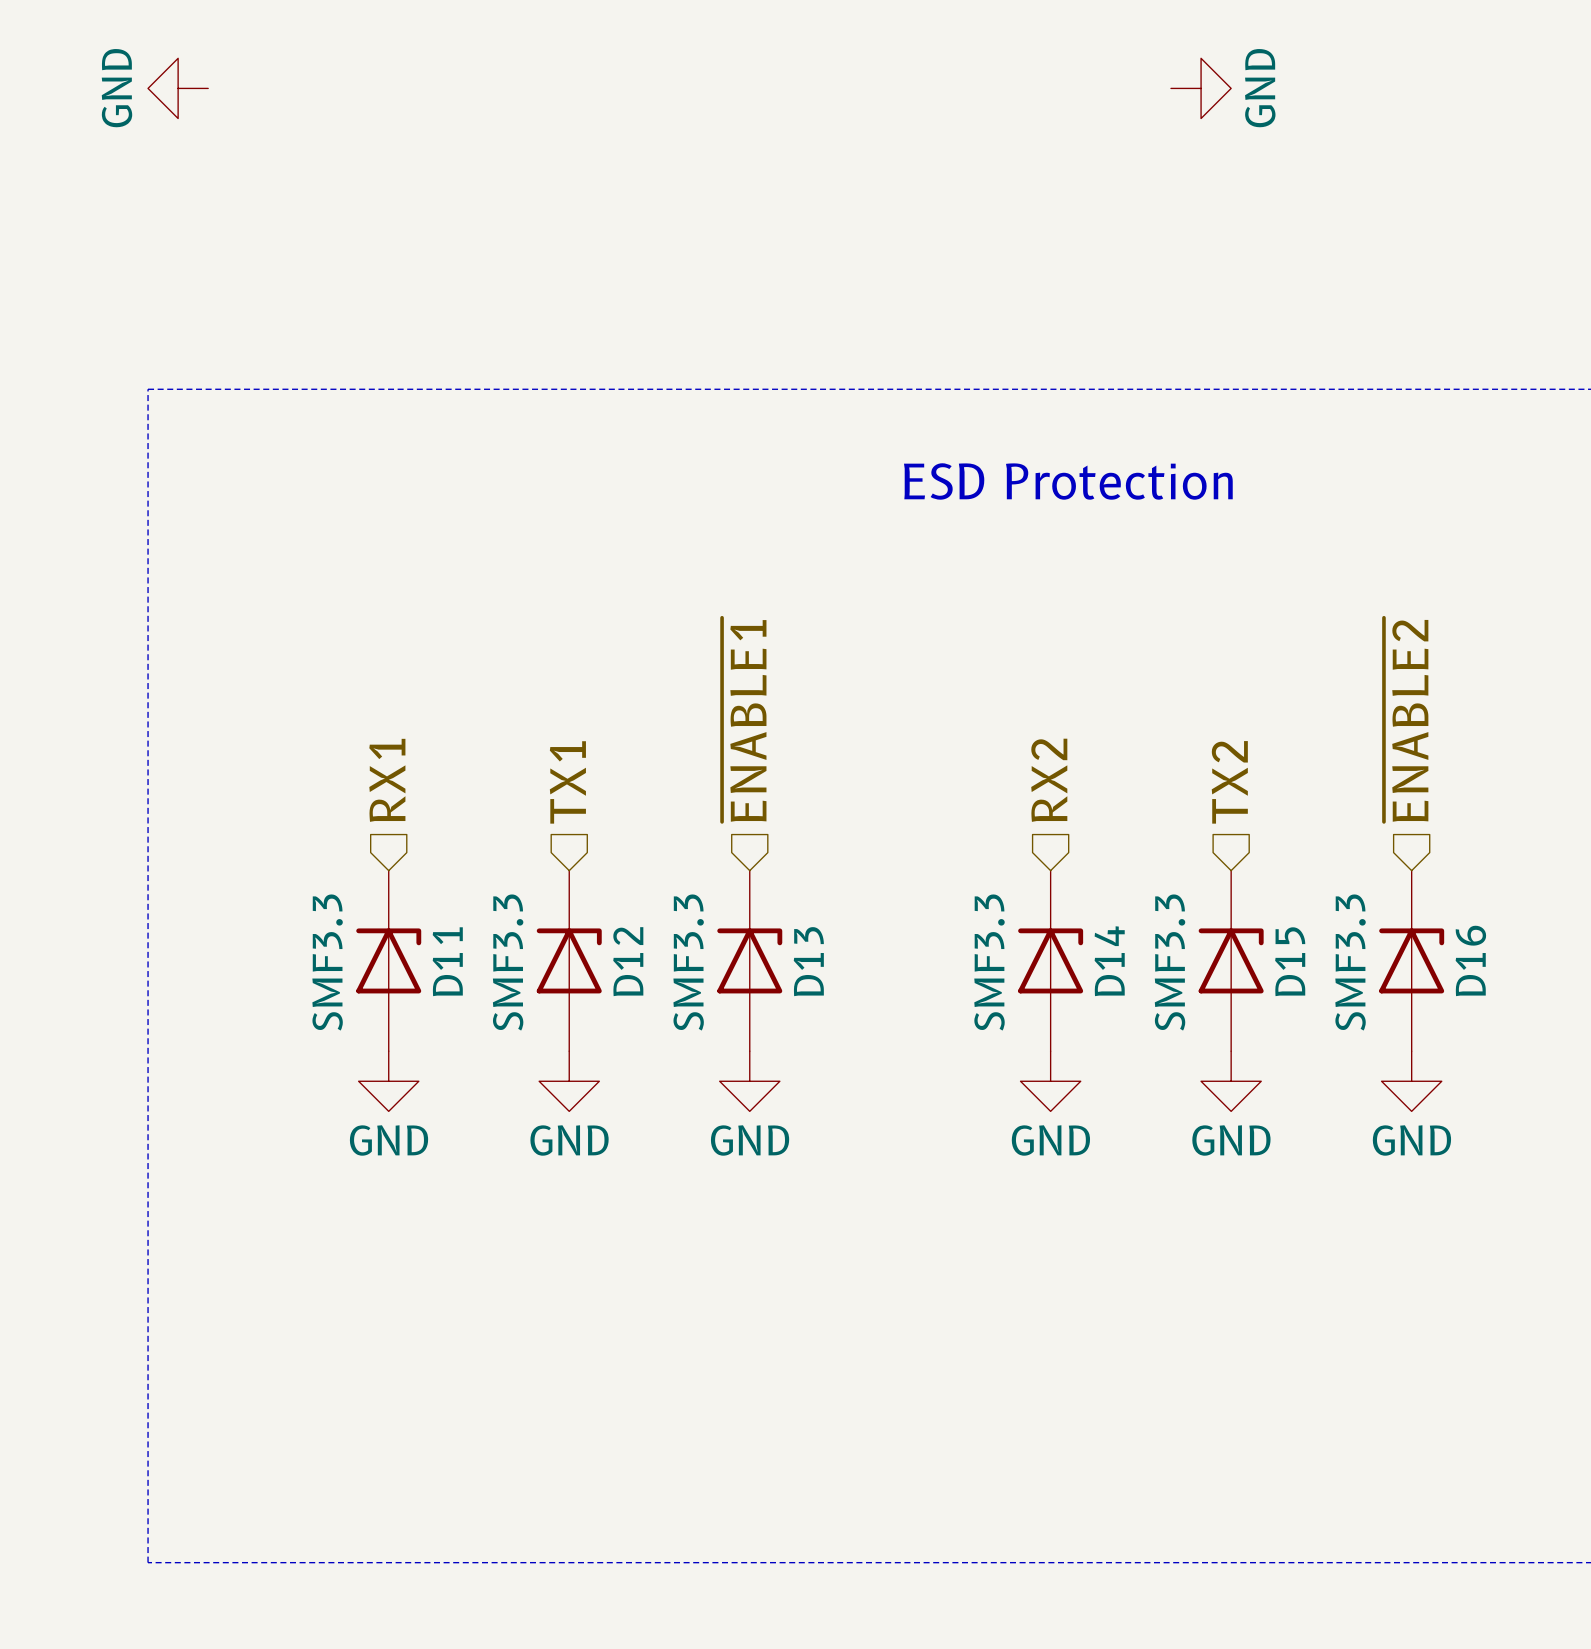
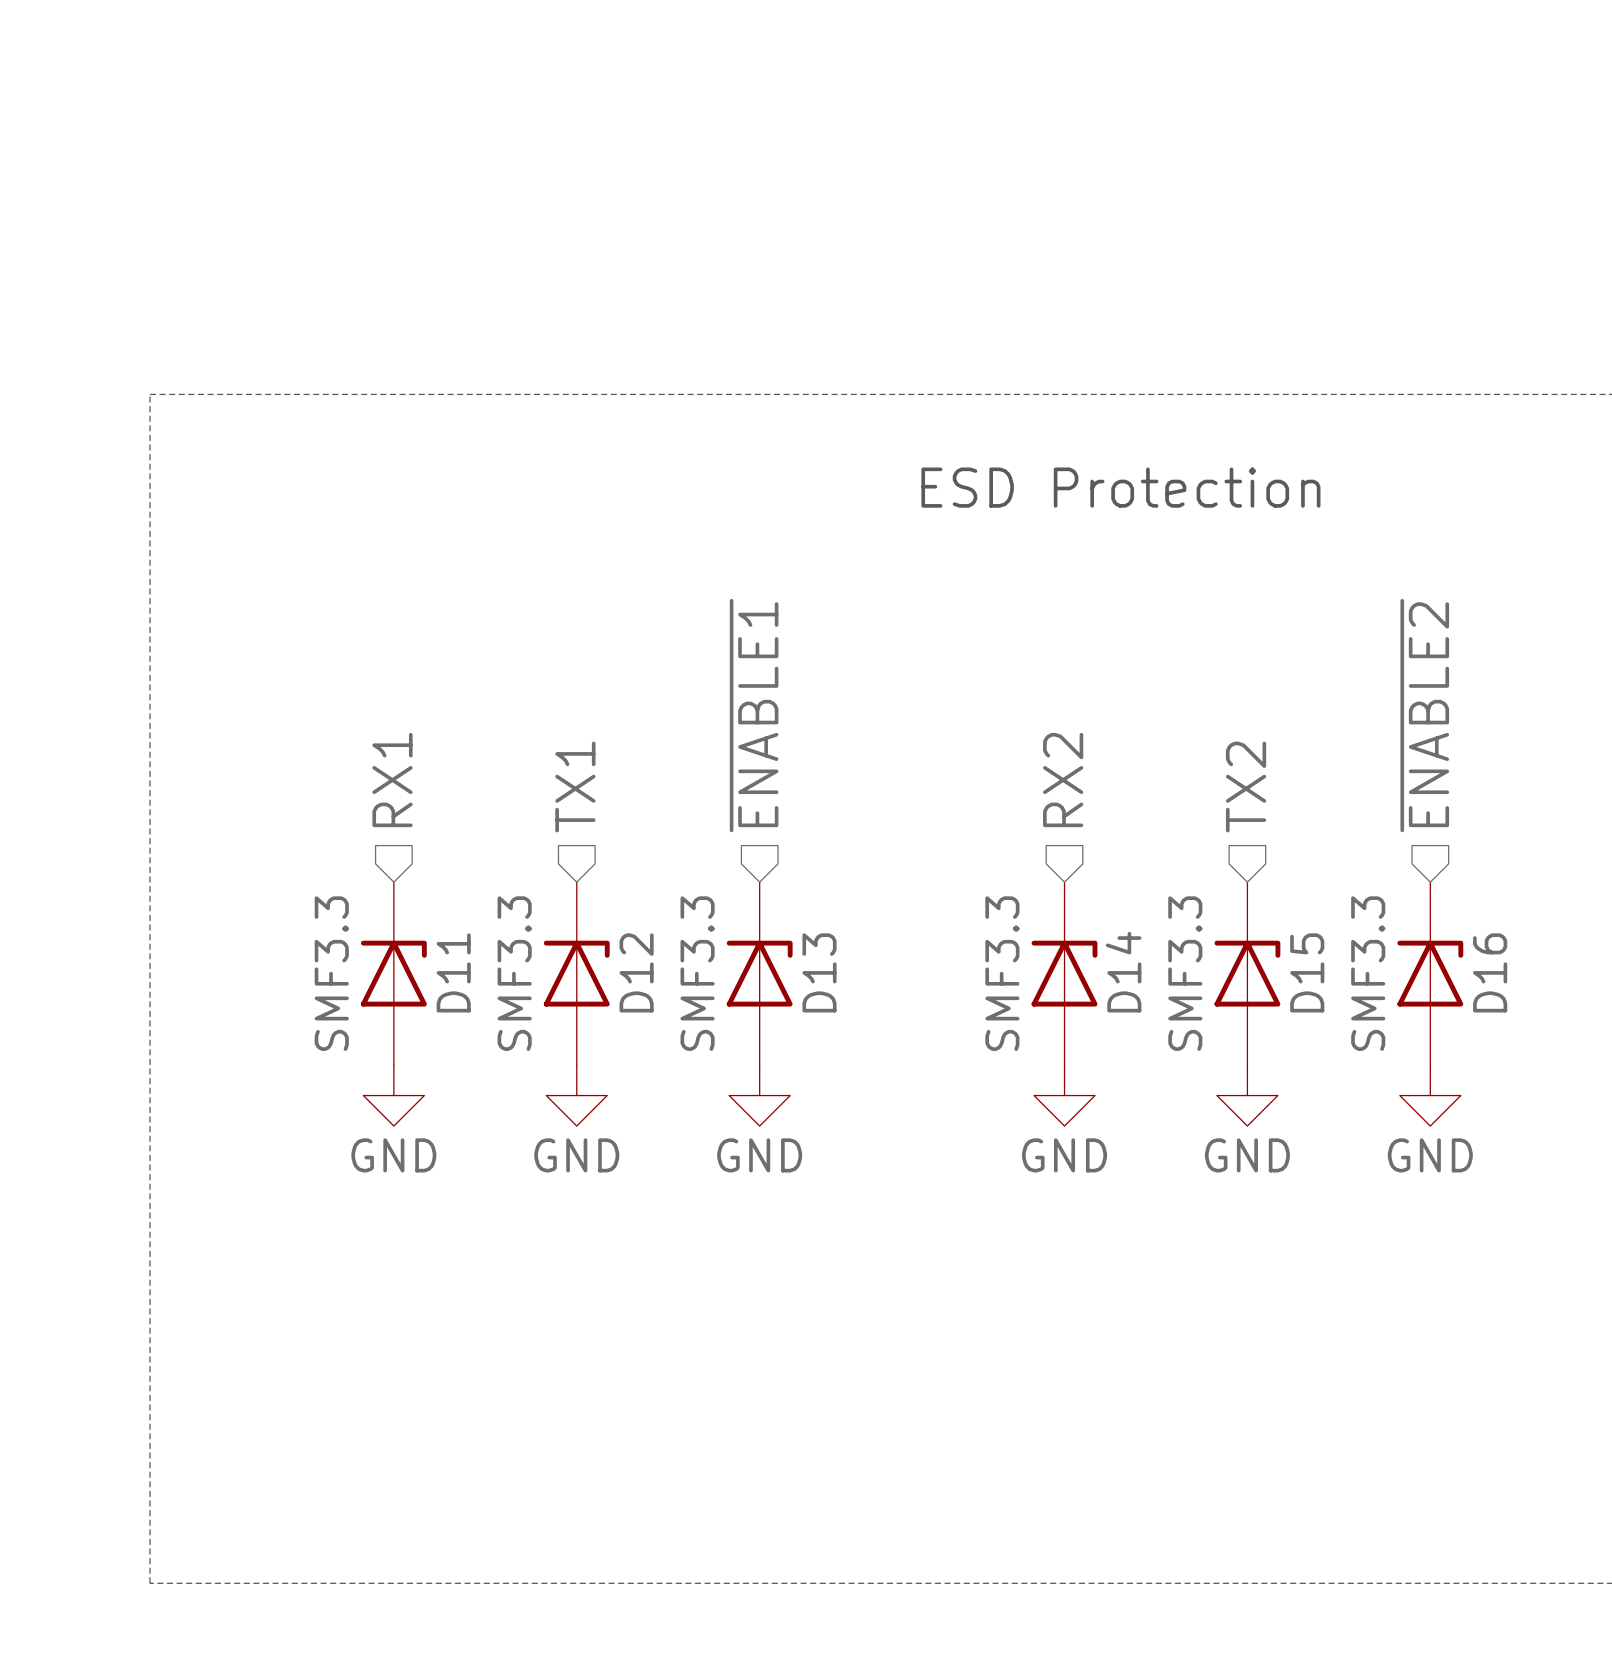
power symbol: GND (178, 88) -> none
power symbol: GND (1201, 88) -> none

